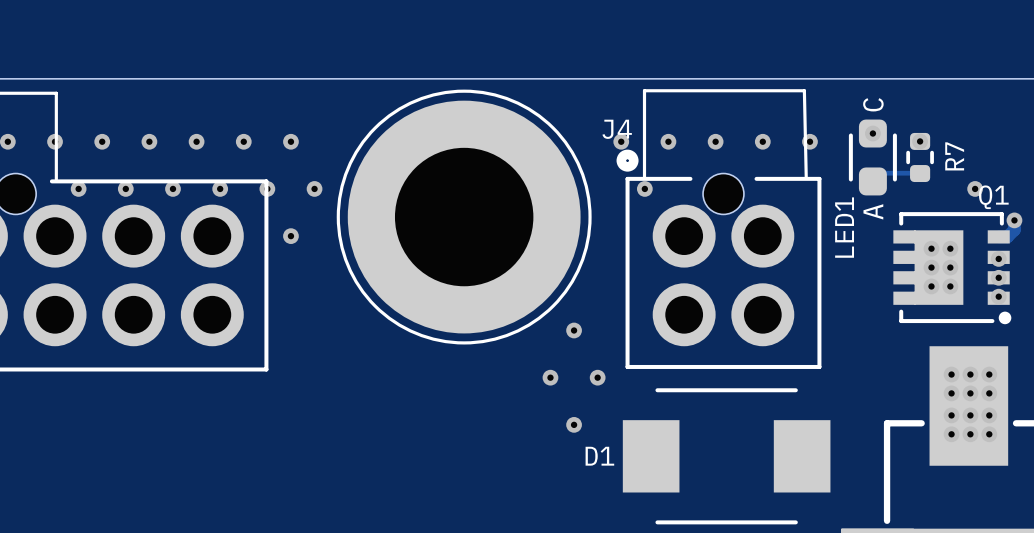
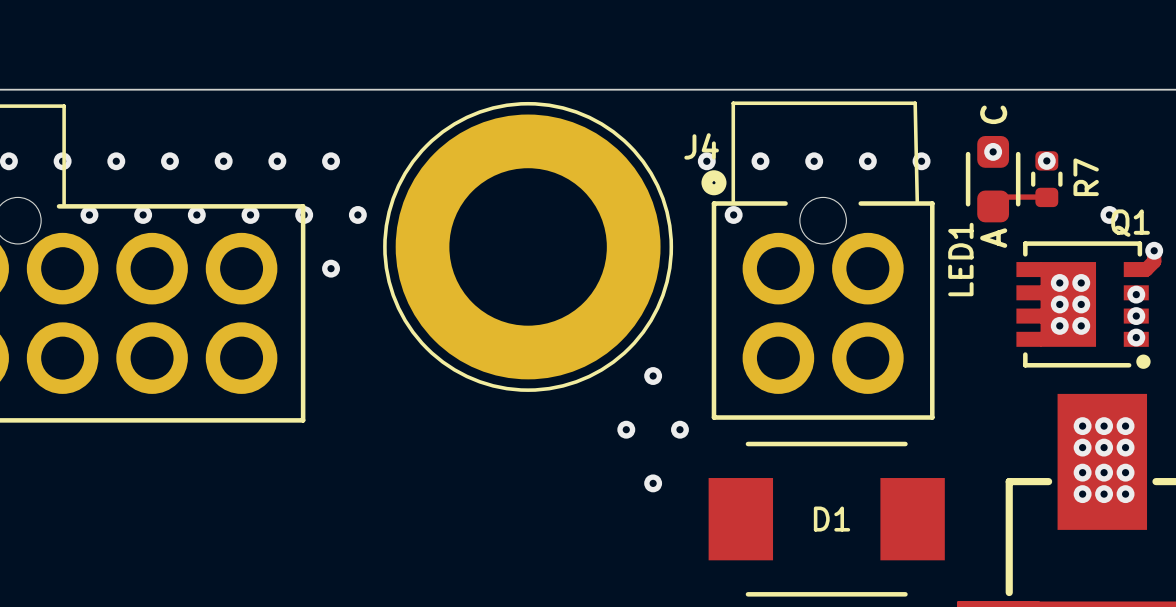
D1 name position: D1 (599, 456) -> D1 (831, 519)

